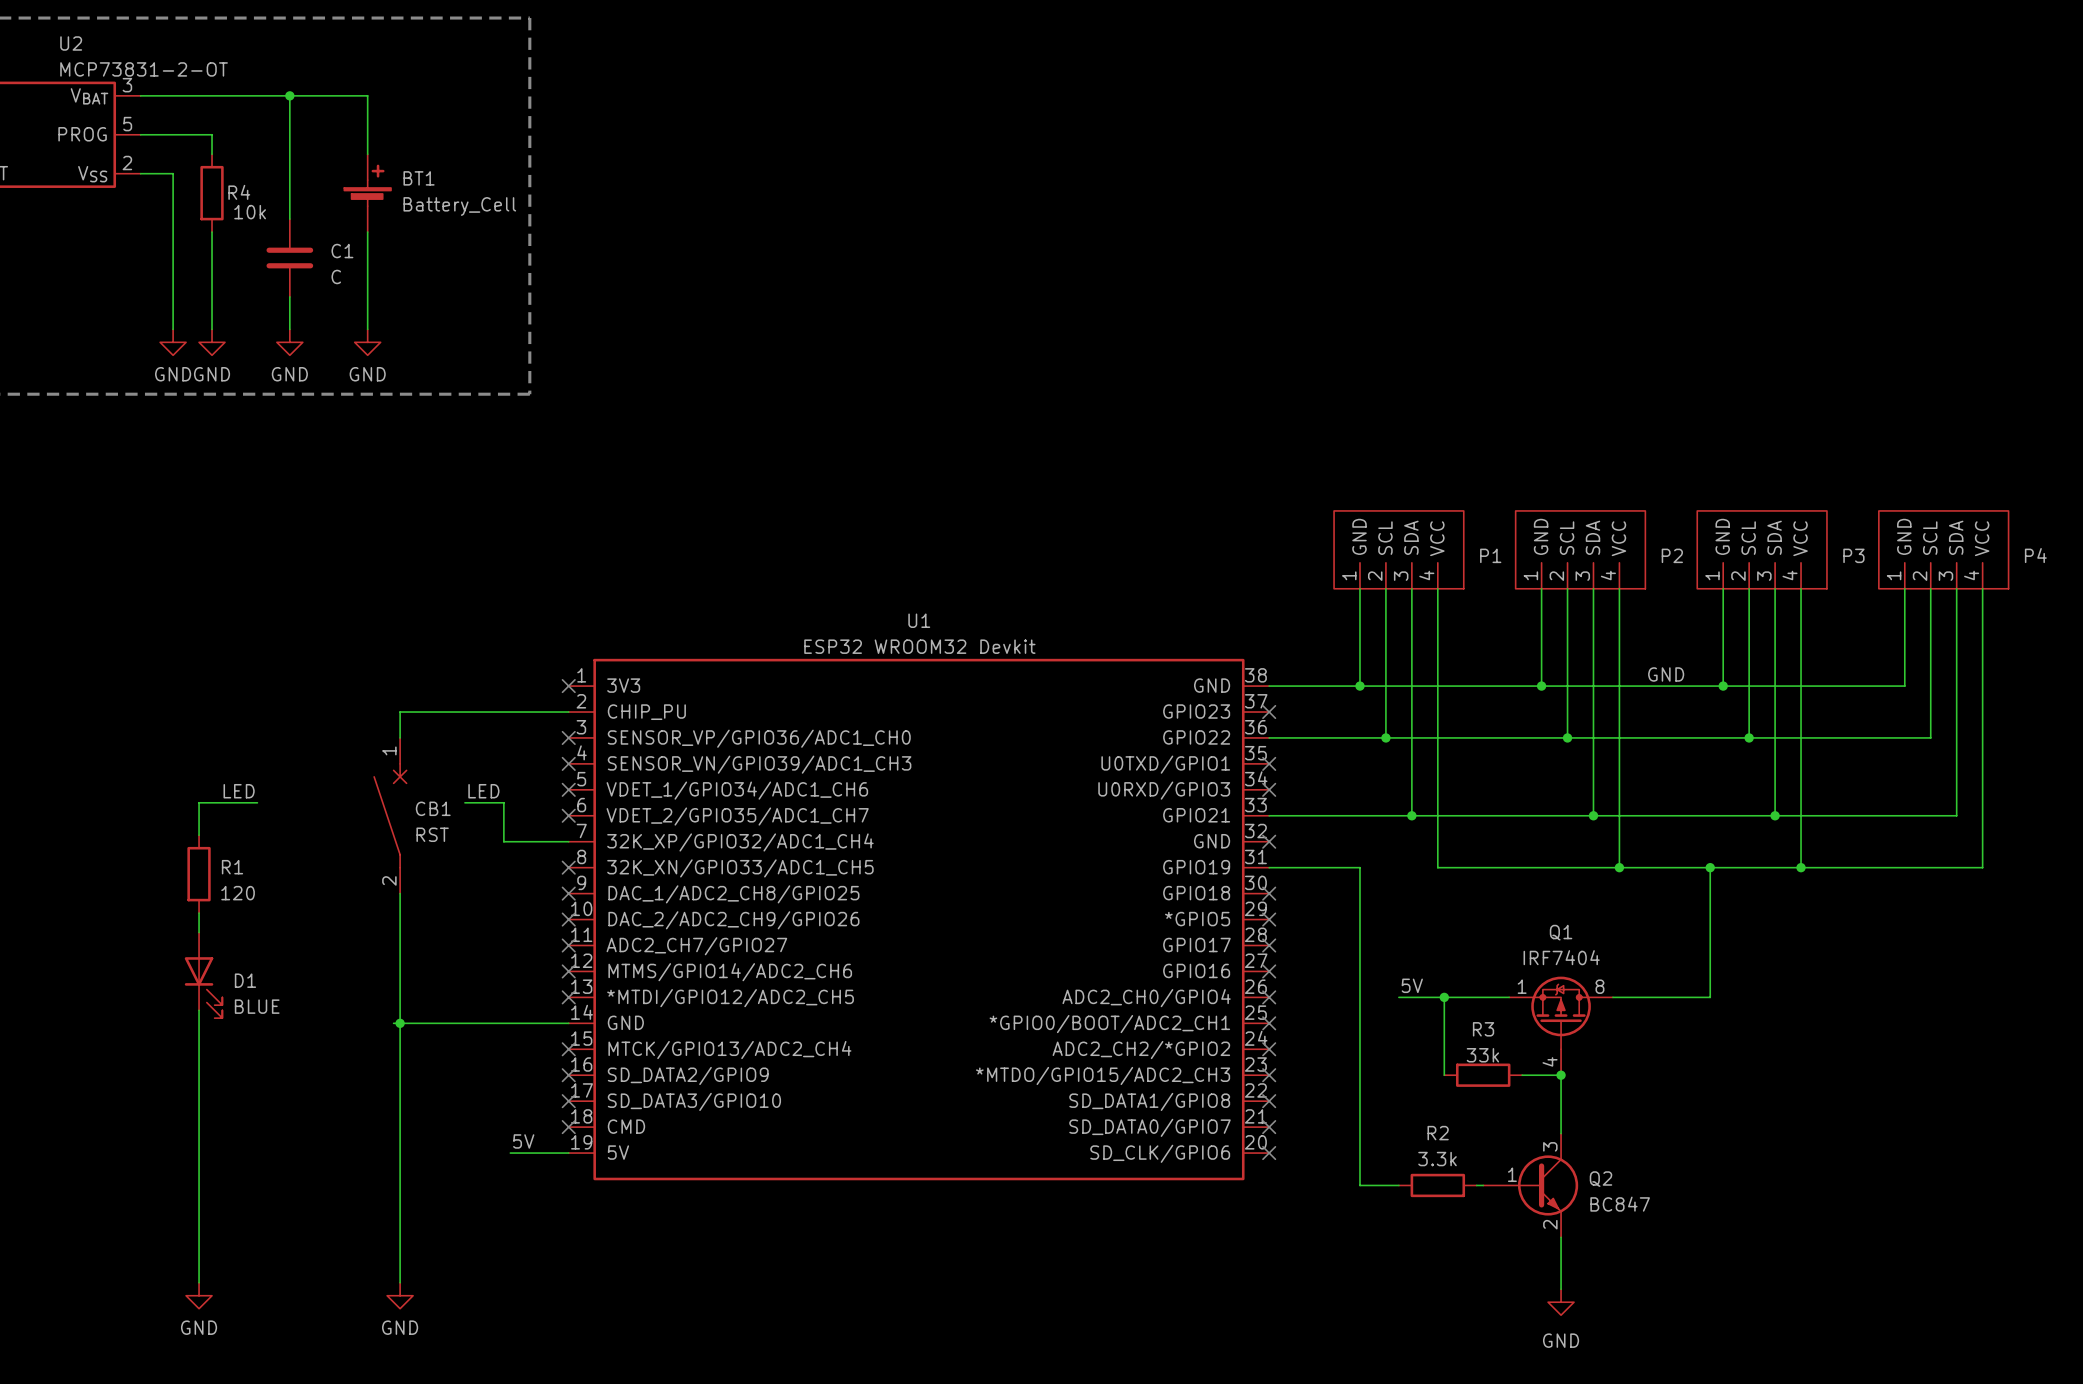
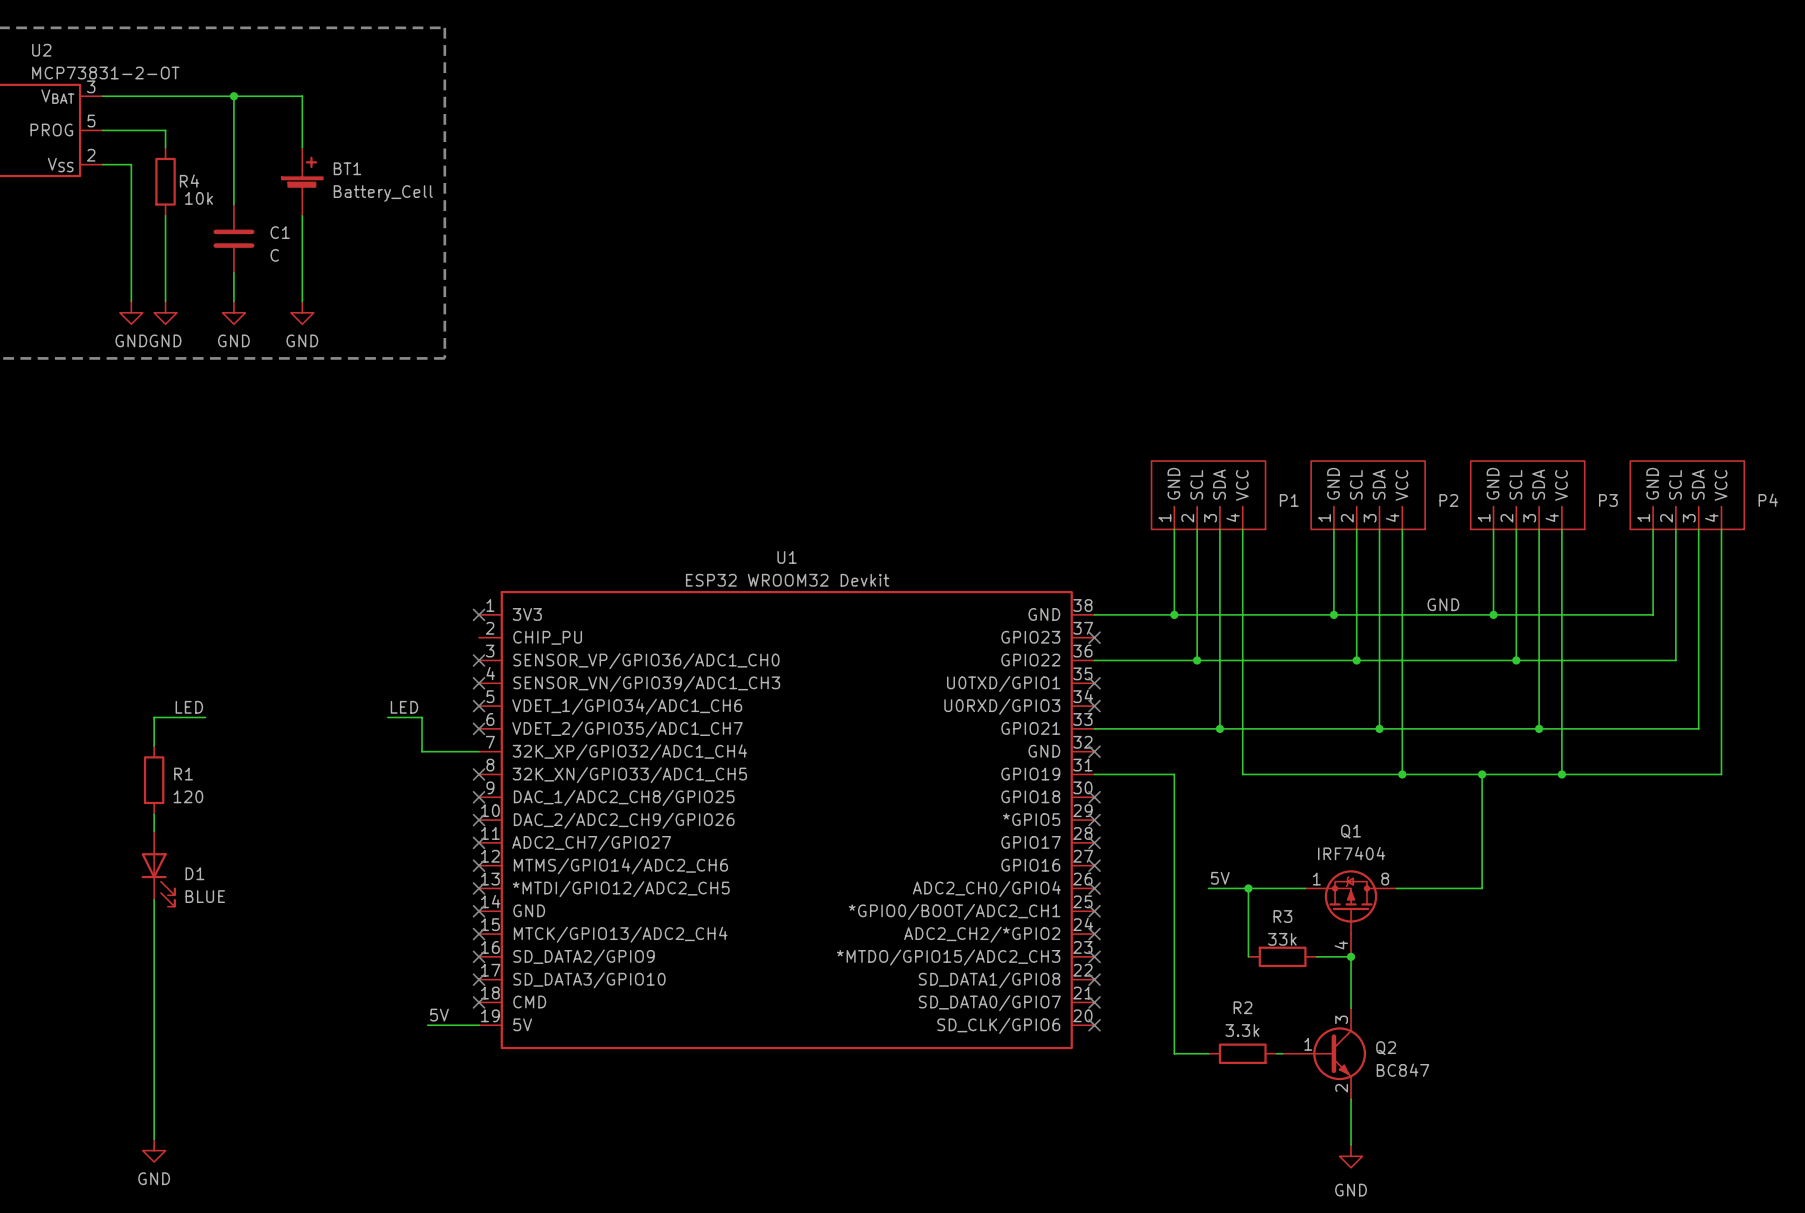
wire: (568, 712) (400, 712) (400, 737) -> none
CB1: RST (390, 815) -> none
wire: (400, 893) (400, 1282) -> none
wire: (393, 1023) (568, 1023) -> none
junction: (400, 1023) -> none
no-connect mark: none -> (479, 911)
power symbol: GND (400, 1295) -> none

